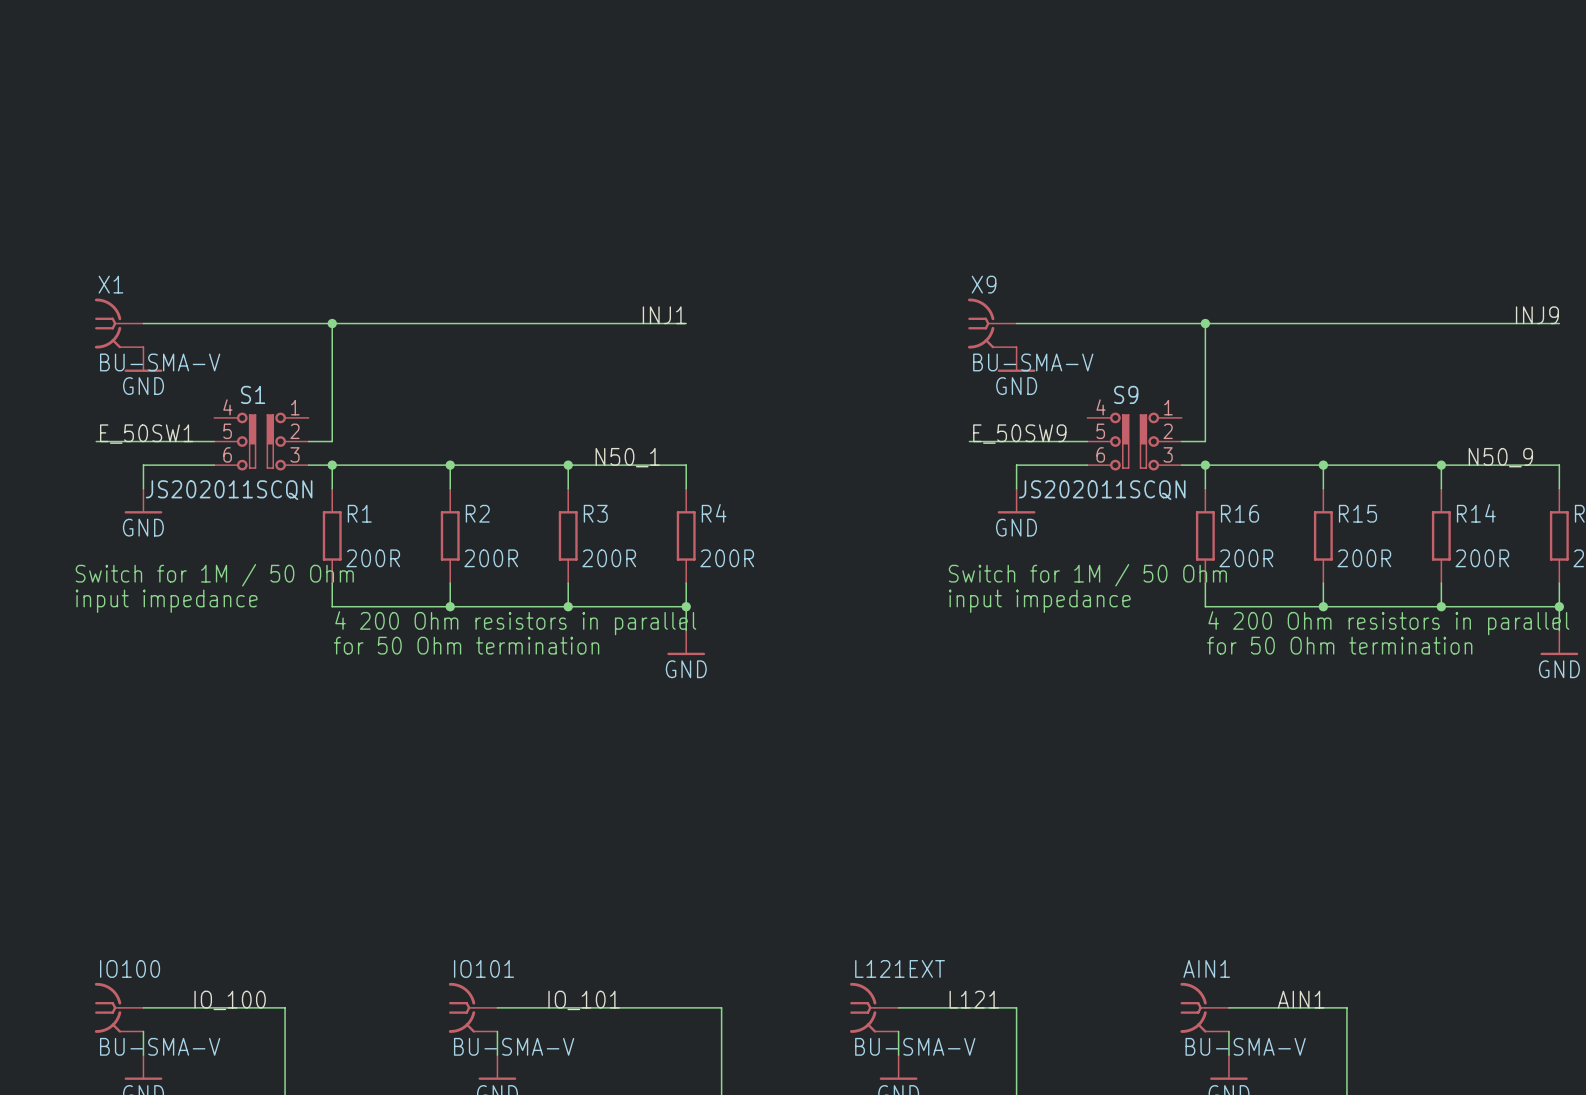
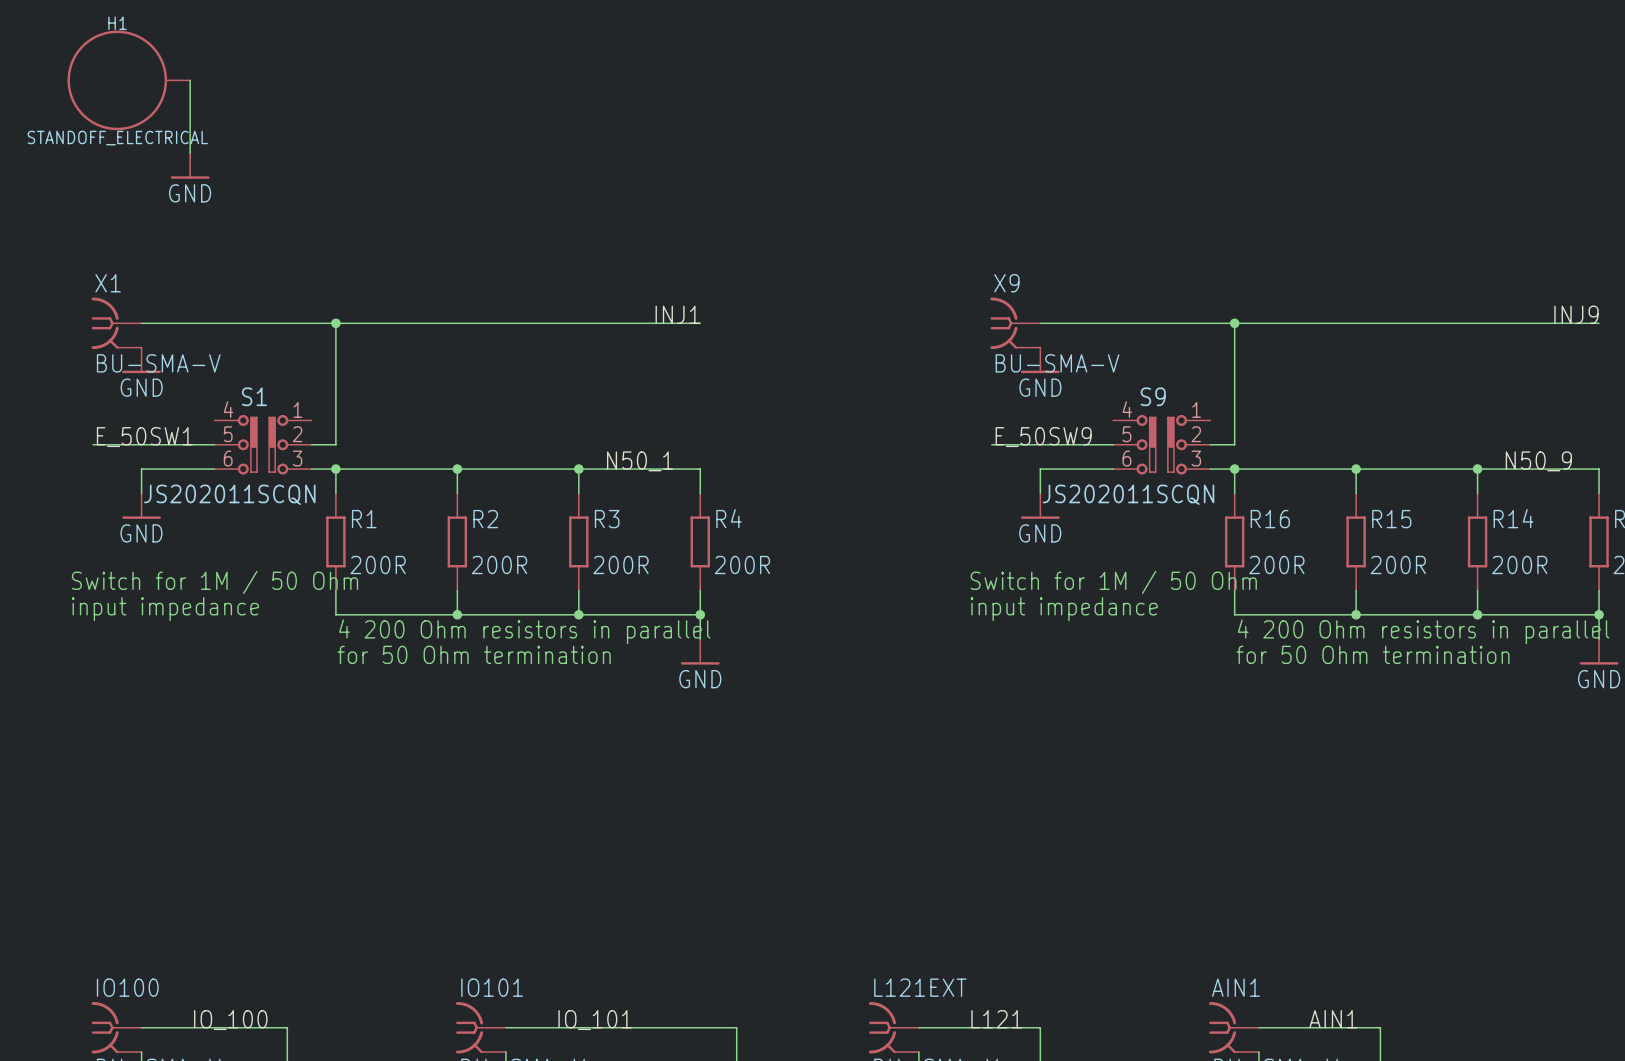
H1: none -> STANDOFF_ELECTRICAL (128, 80)
wire: none -> (190, 80) (190, 153)
power symbol: none -> GND (190, 166)

